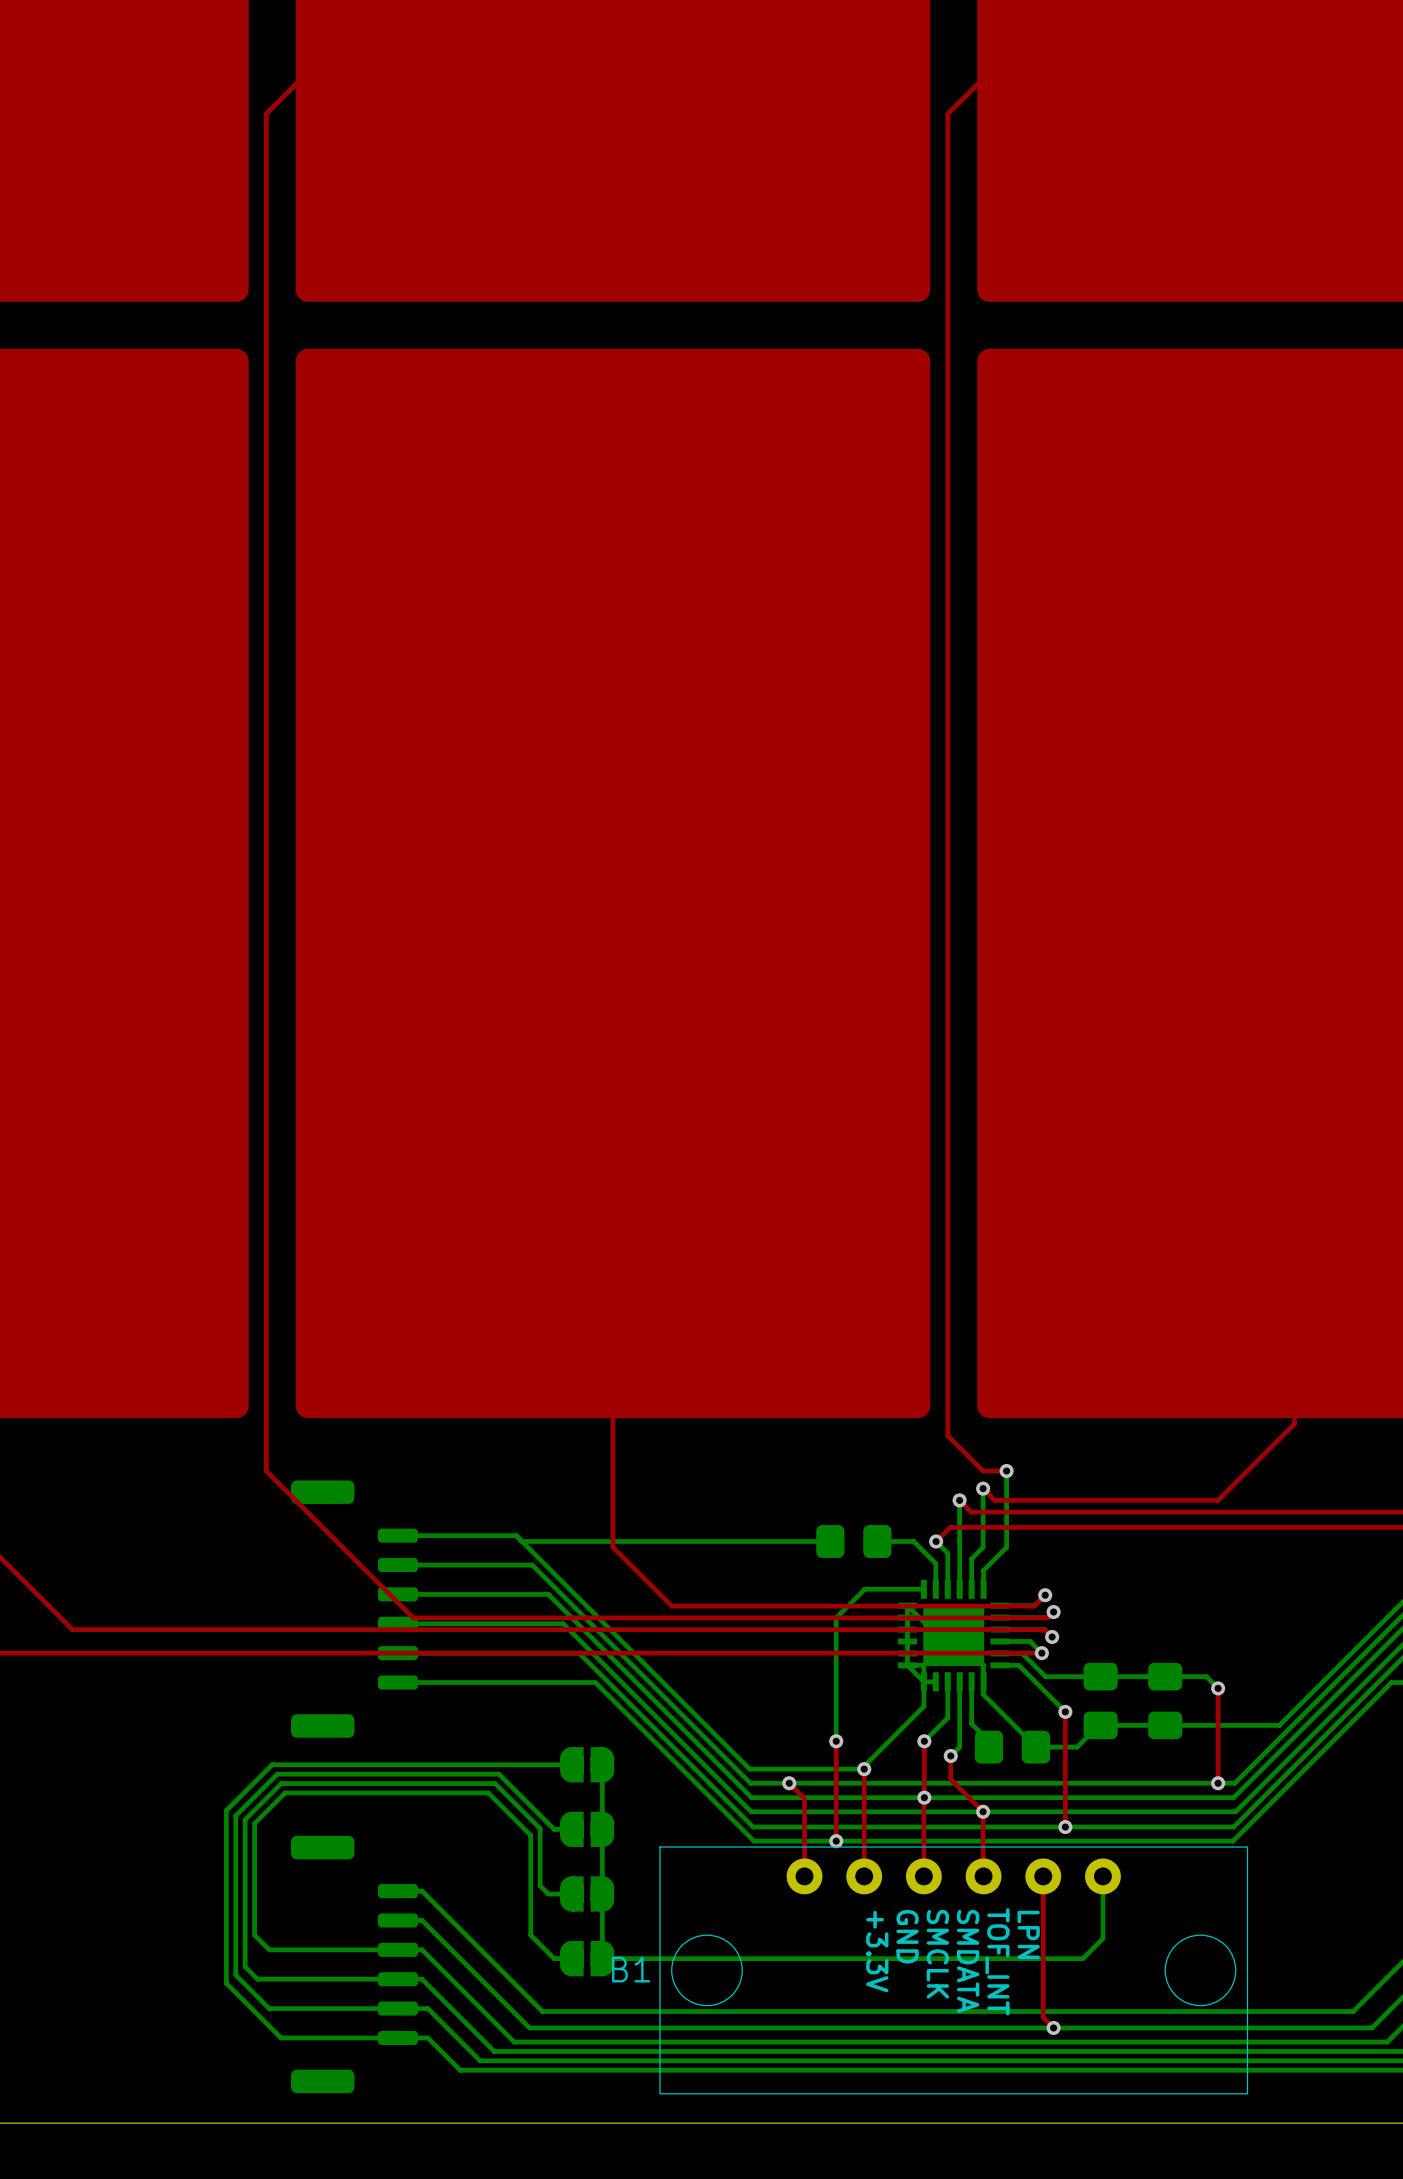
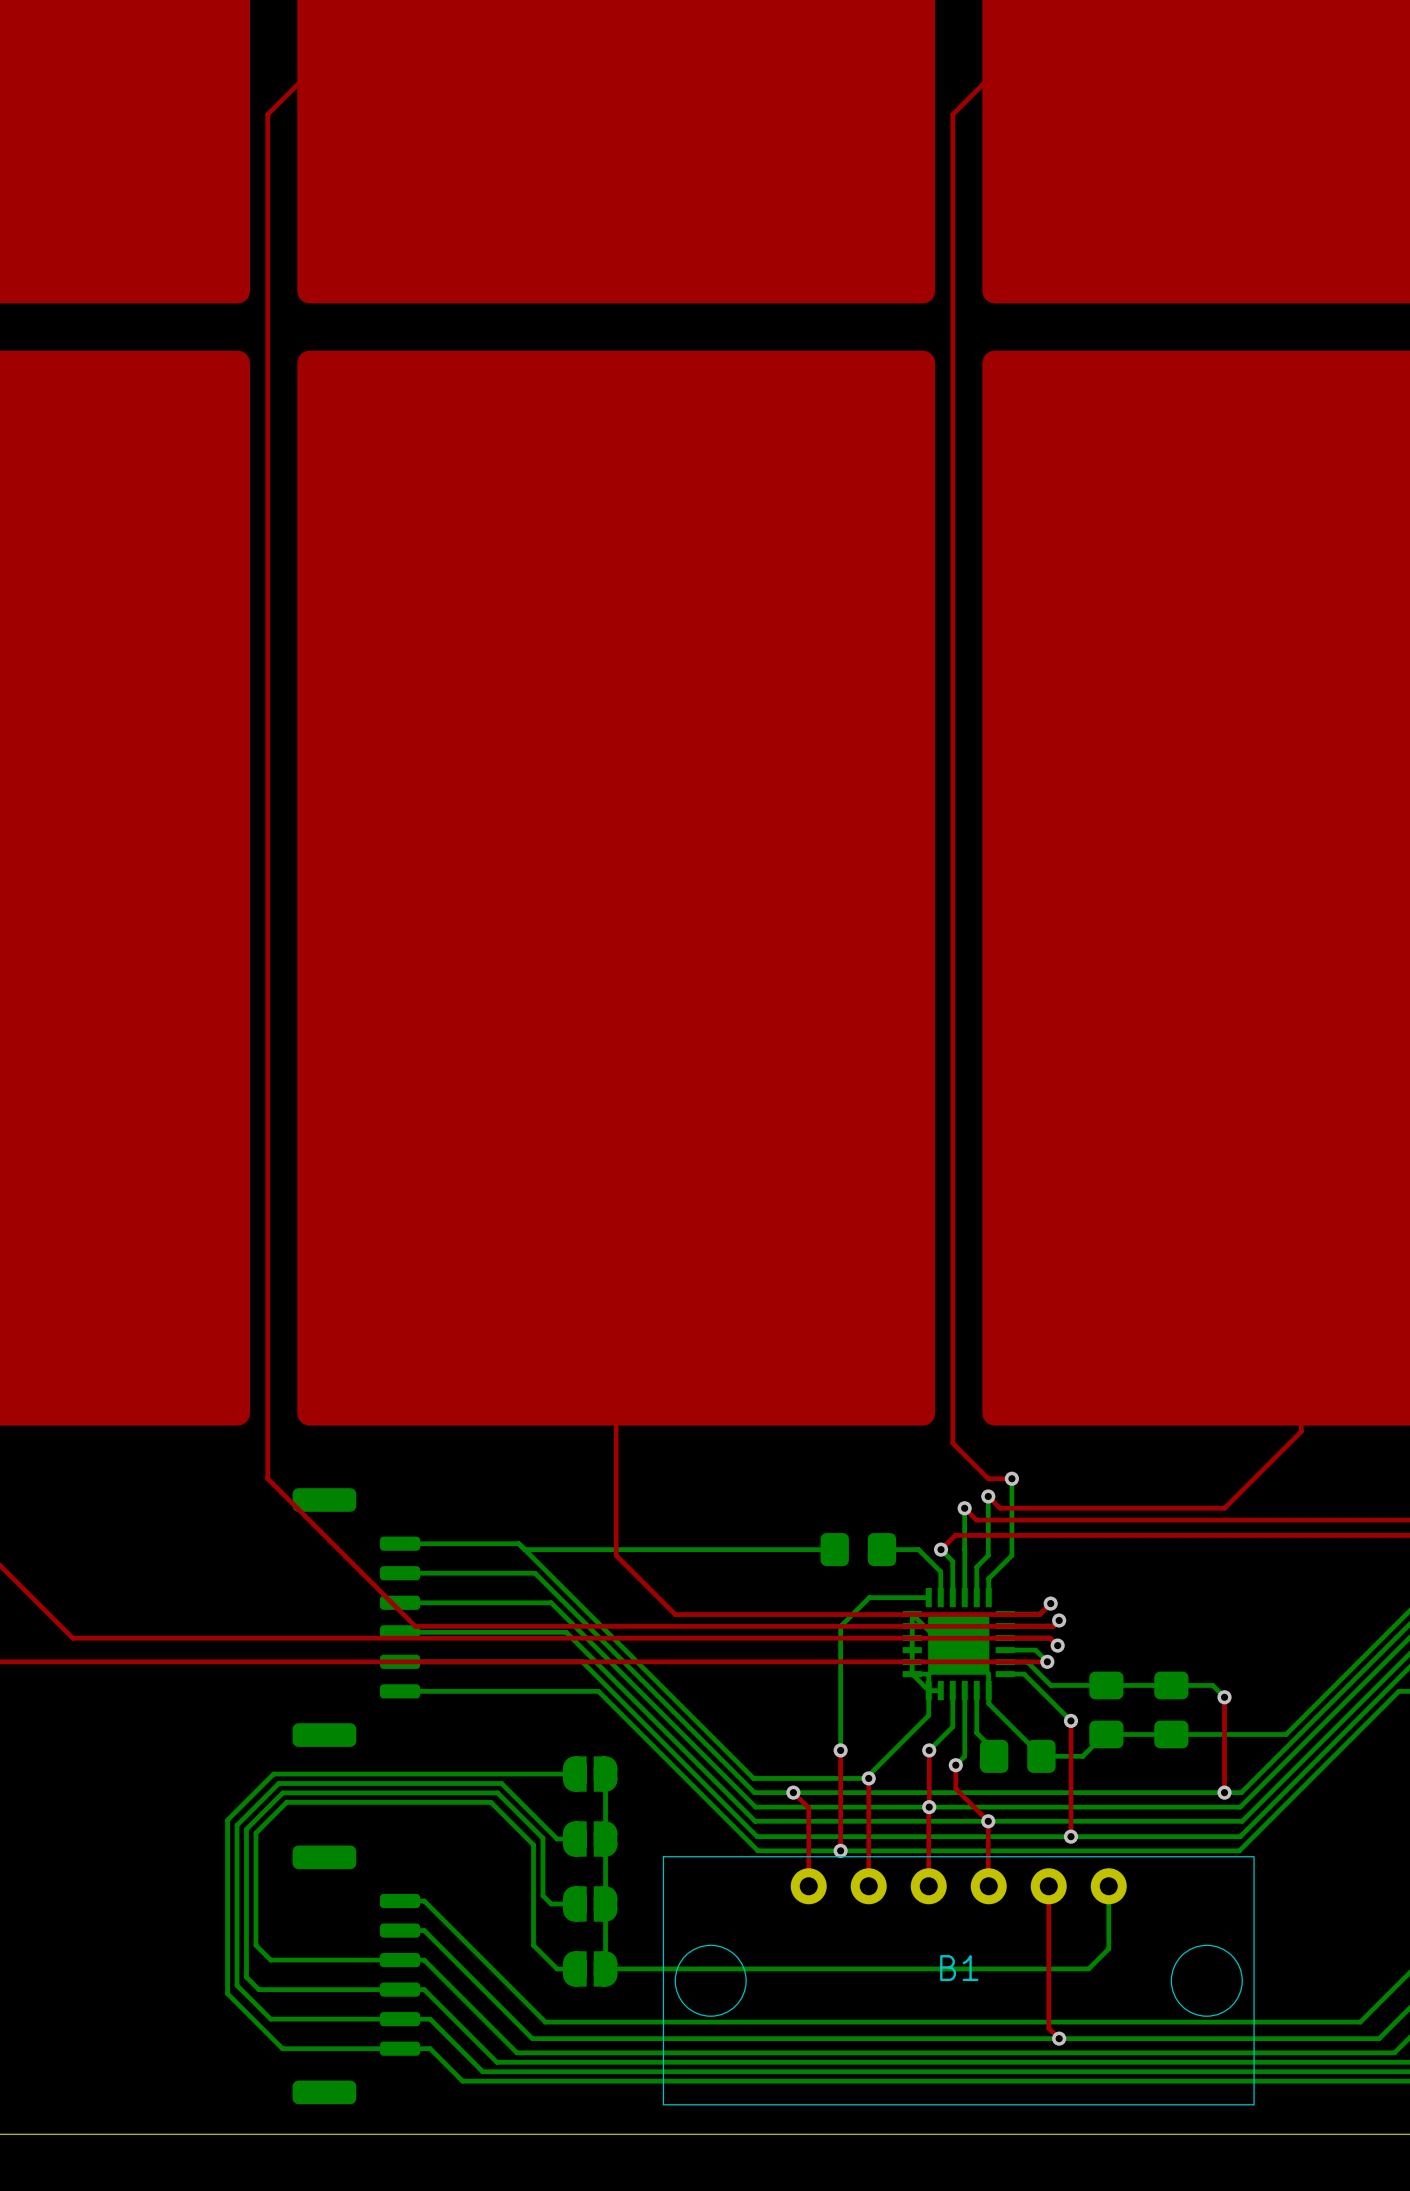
text: LPN (1028, 1934) -> none
text: GND (907, 1936) -> none
text: +3.3V (877, 1951) -> none
text: SMCLK (937, 1954) -> none
text: SMDATA (968, 1961) -> none
text: TOF_INT (997, 1961) -> none
B1 name position: B1 (631, 1969) -> B1 (959, 1968)

